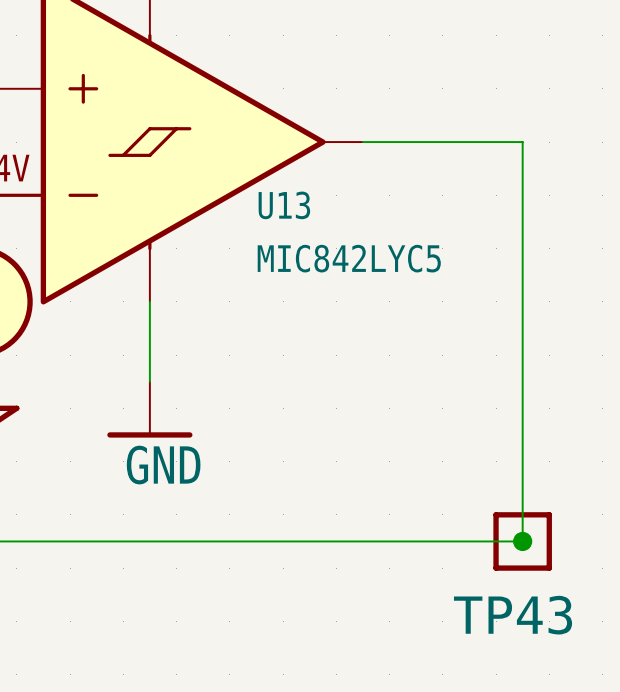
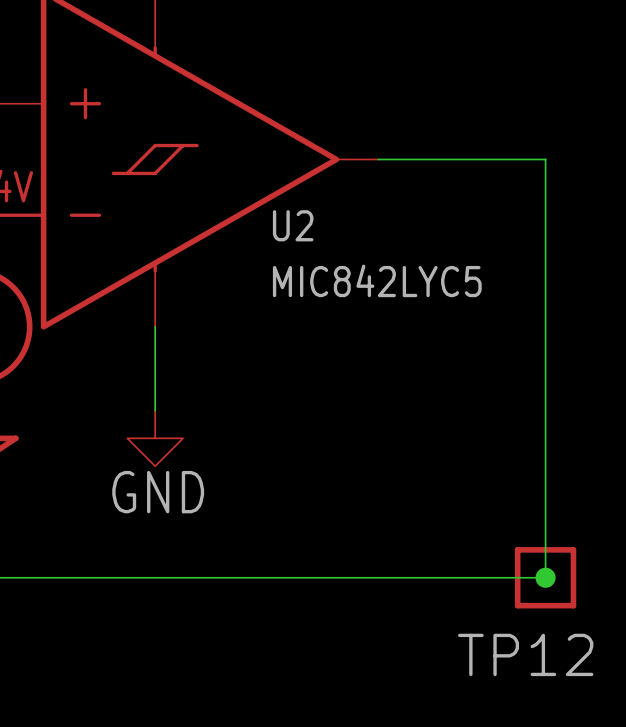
U13 name: U13 (284, 205) -> U2 (293, 225)
power symbol shape: [107, 381, 193, 438] -> [127, 410, 184, 467]
TP43 name: TP43 (513, 615) -> TP12 (525, 654)

